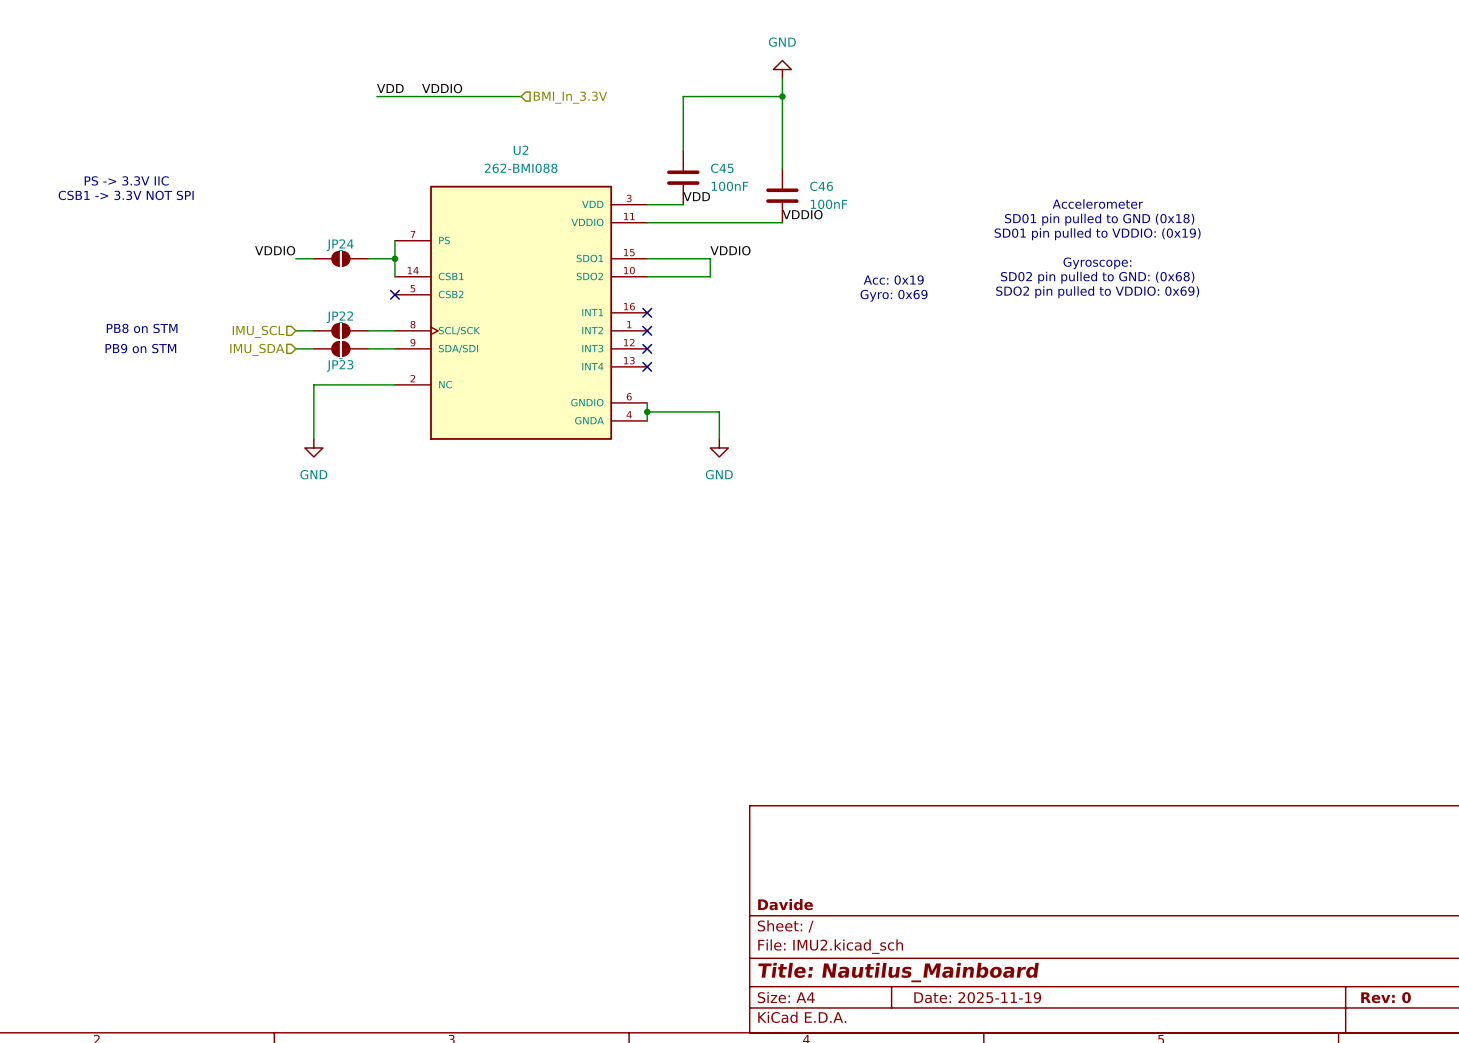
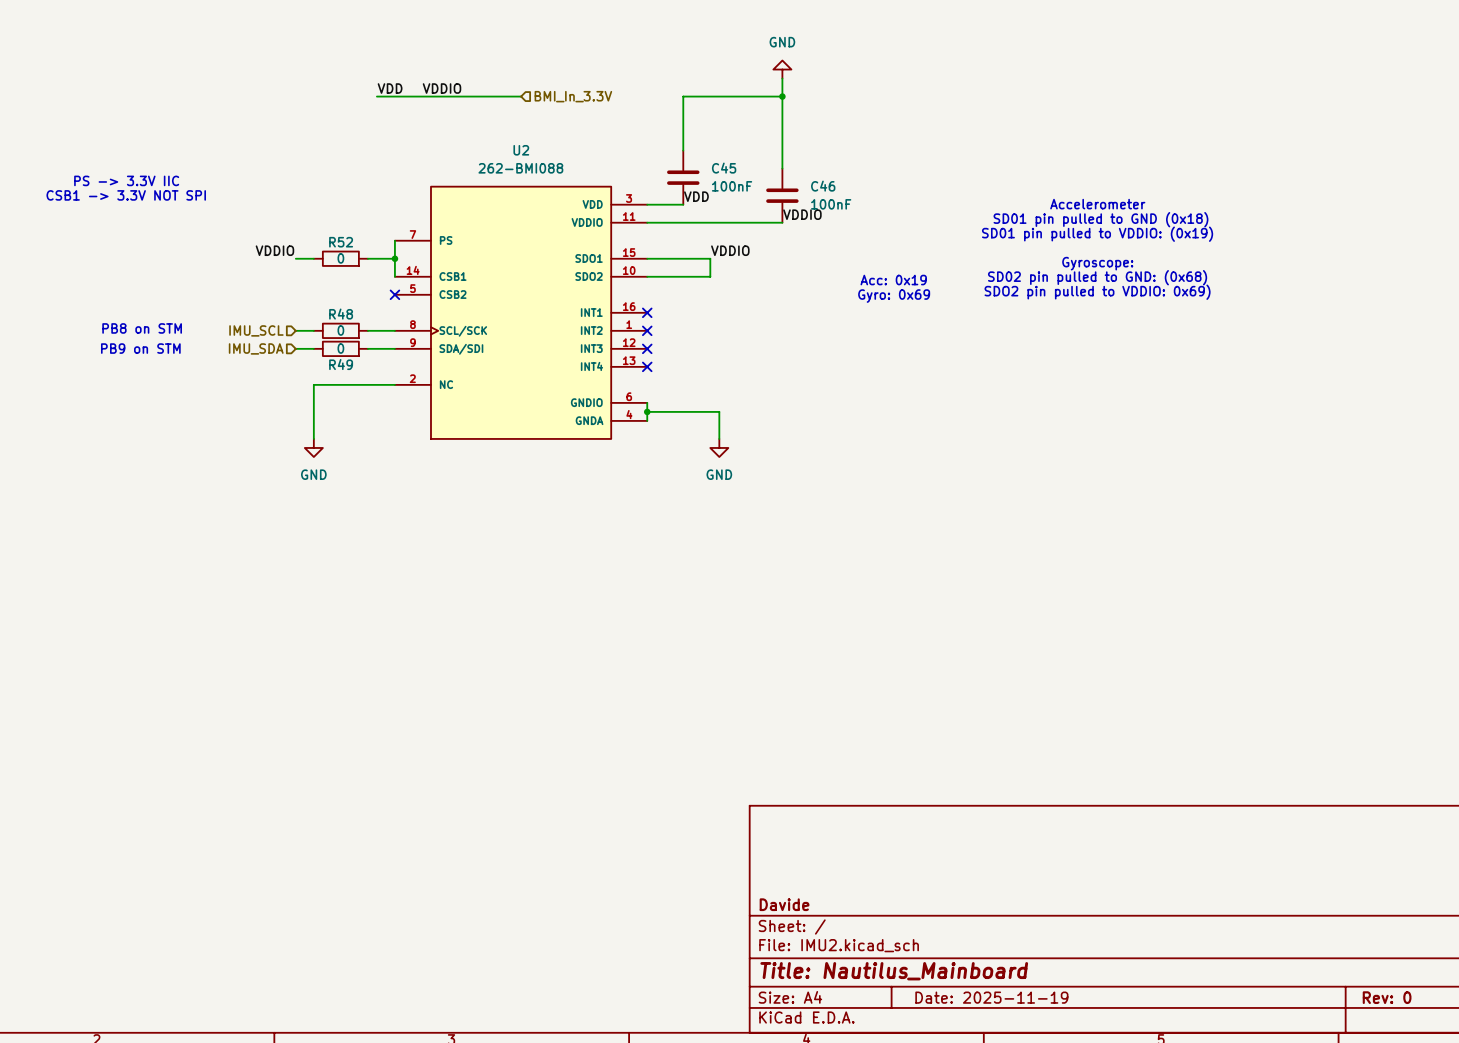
JP24: - (340, 258) -> none
R52: none -> 0 (340, 258)
JP22: - (340, 330) -> none
R48: none -> 0 (340, 330)
JP23: - (340, 348) -> none
R49: none -> 0 (340, 348)

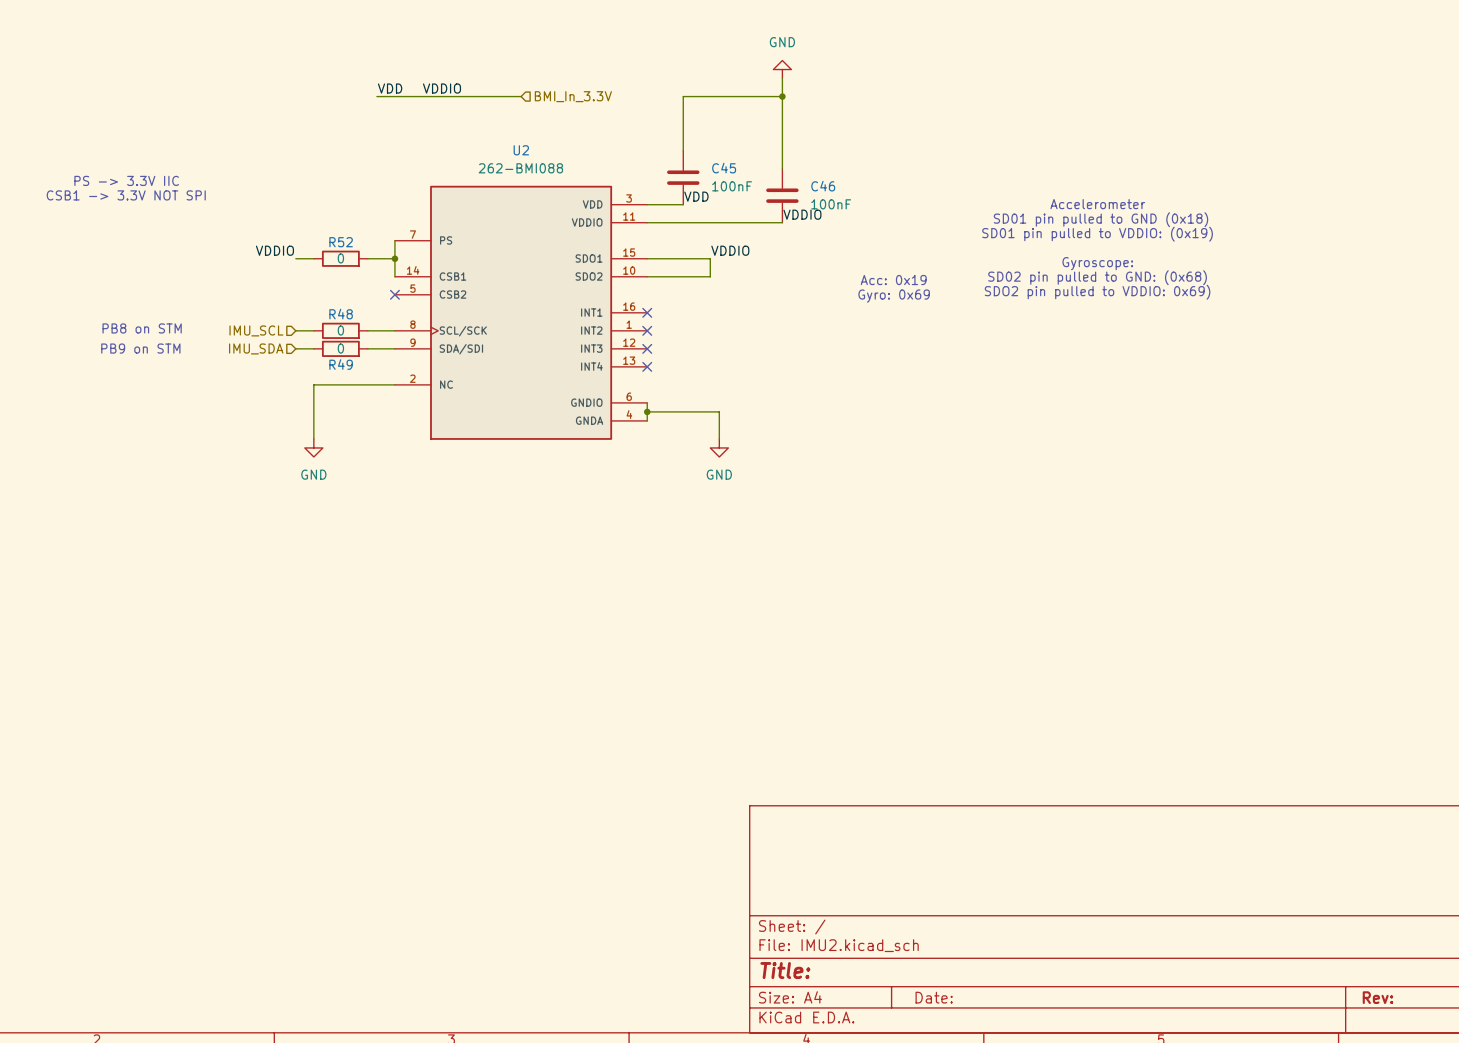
title block: Davide (784, 904) -> none
title block: Title: Nautilus_Mainboard (894, 971) -> Title: (785, 970)
title block: Date: 2025-11-19 (991, 997) -> Date: (934, 997)
title block: Rev: 0 (1387, 997) -> Rev: (1377, 997)

